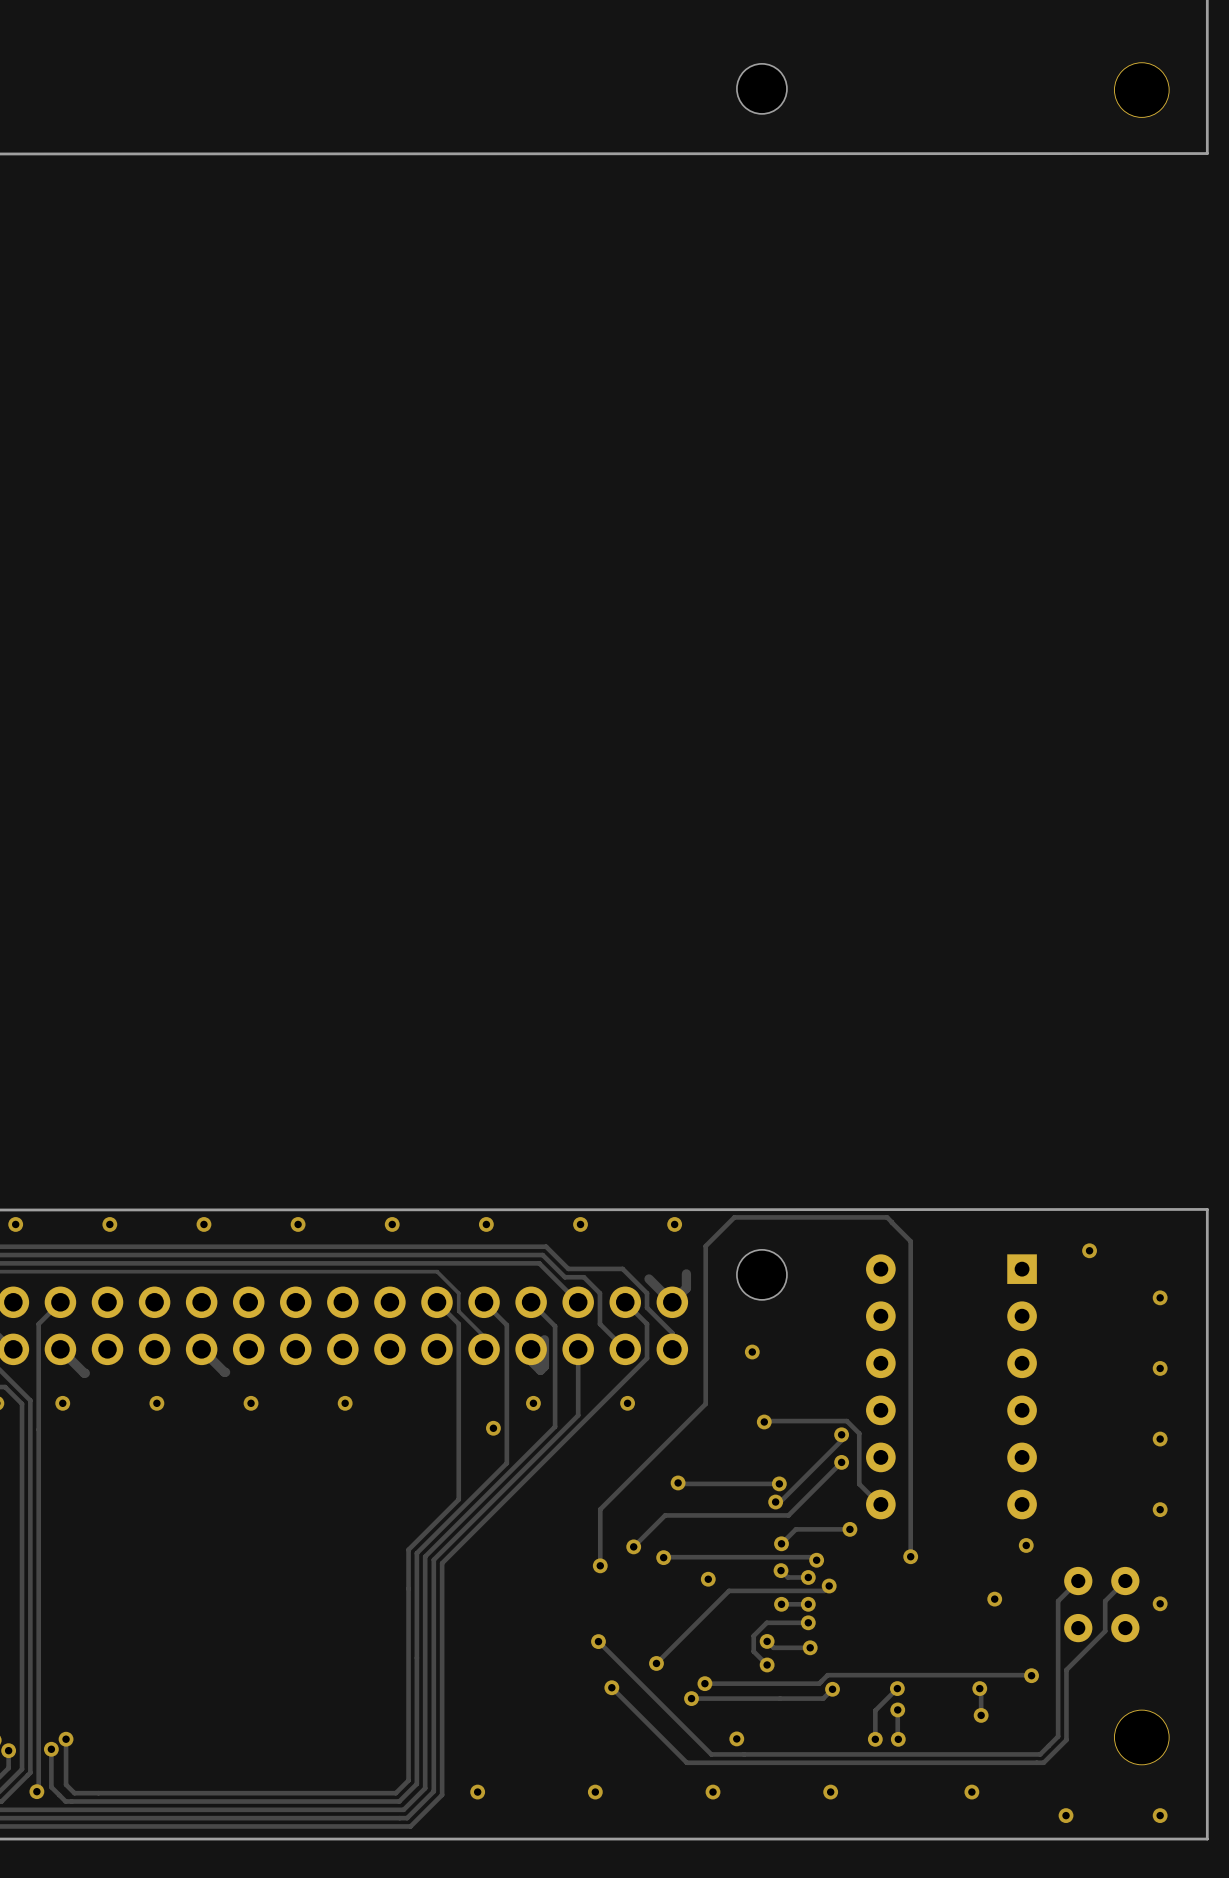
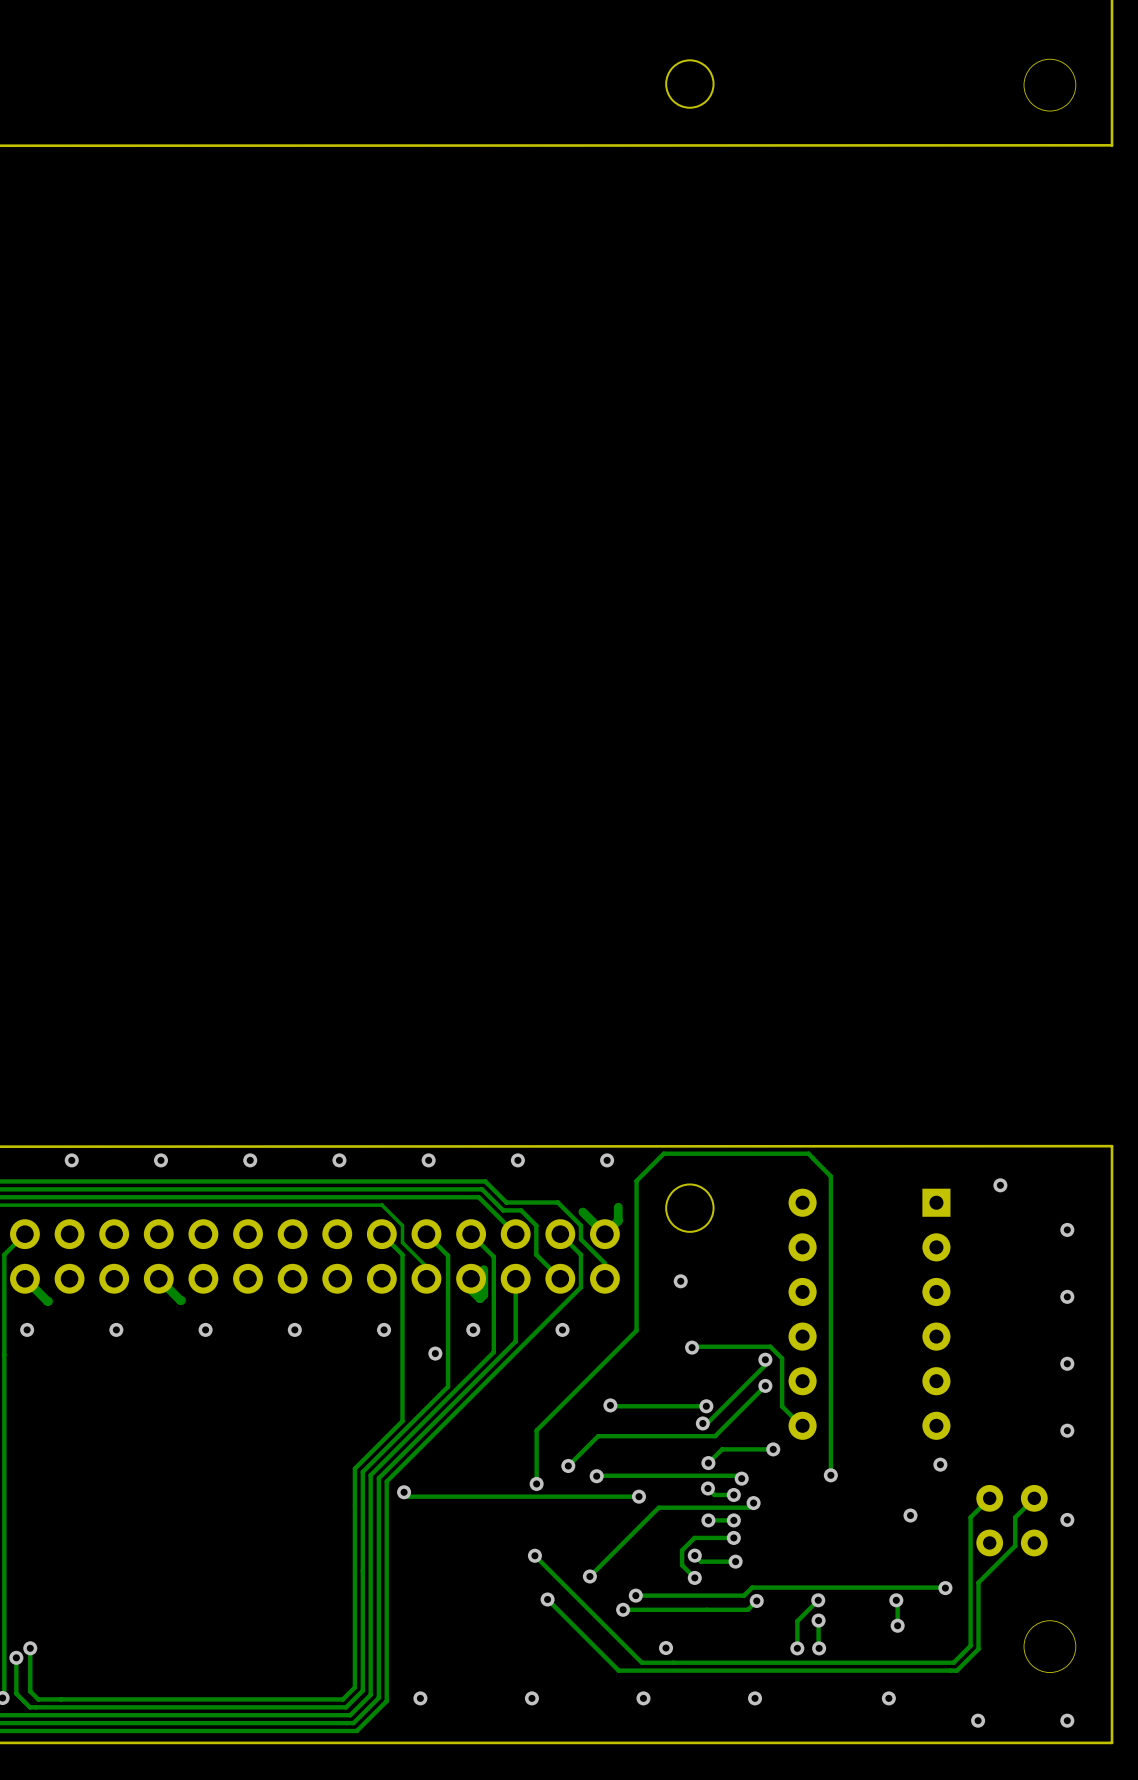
via: none -> (384, 1329)
track: none -> (404, 1492) (408, 1496) (639, 1496)
via: none -> (404, 1492)

